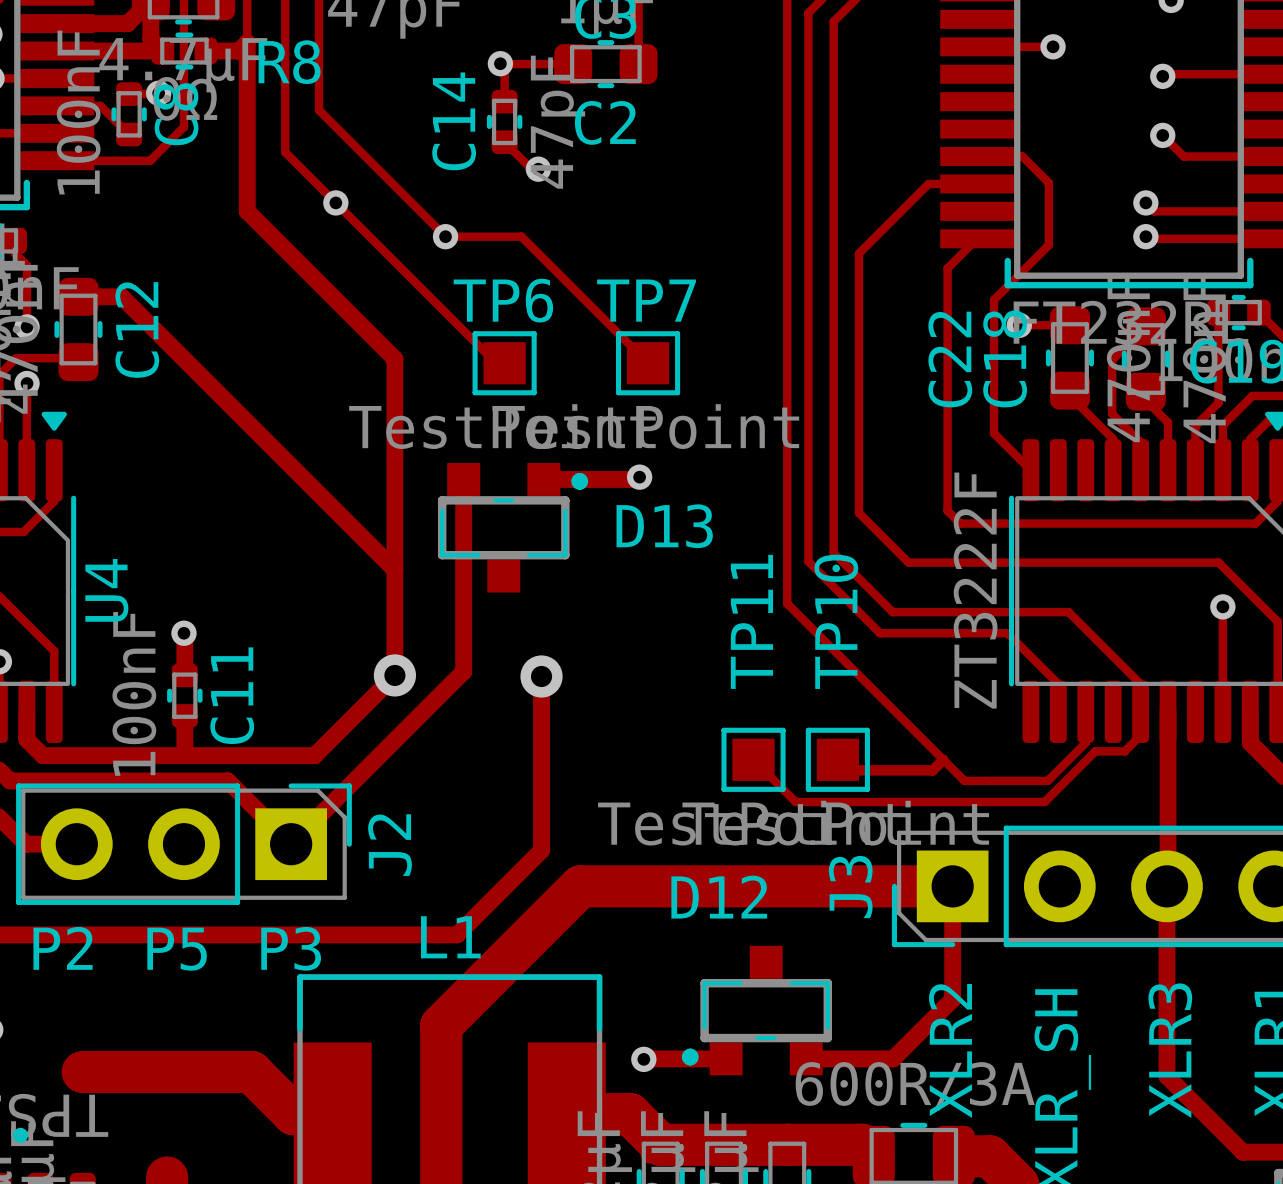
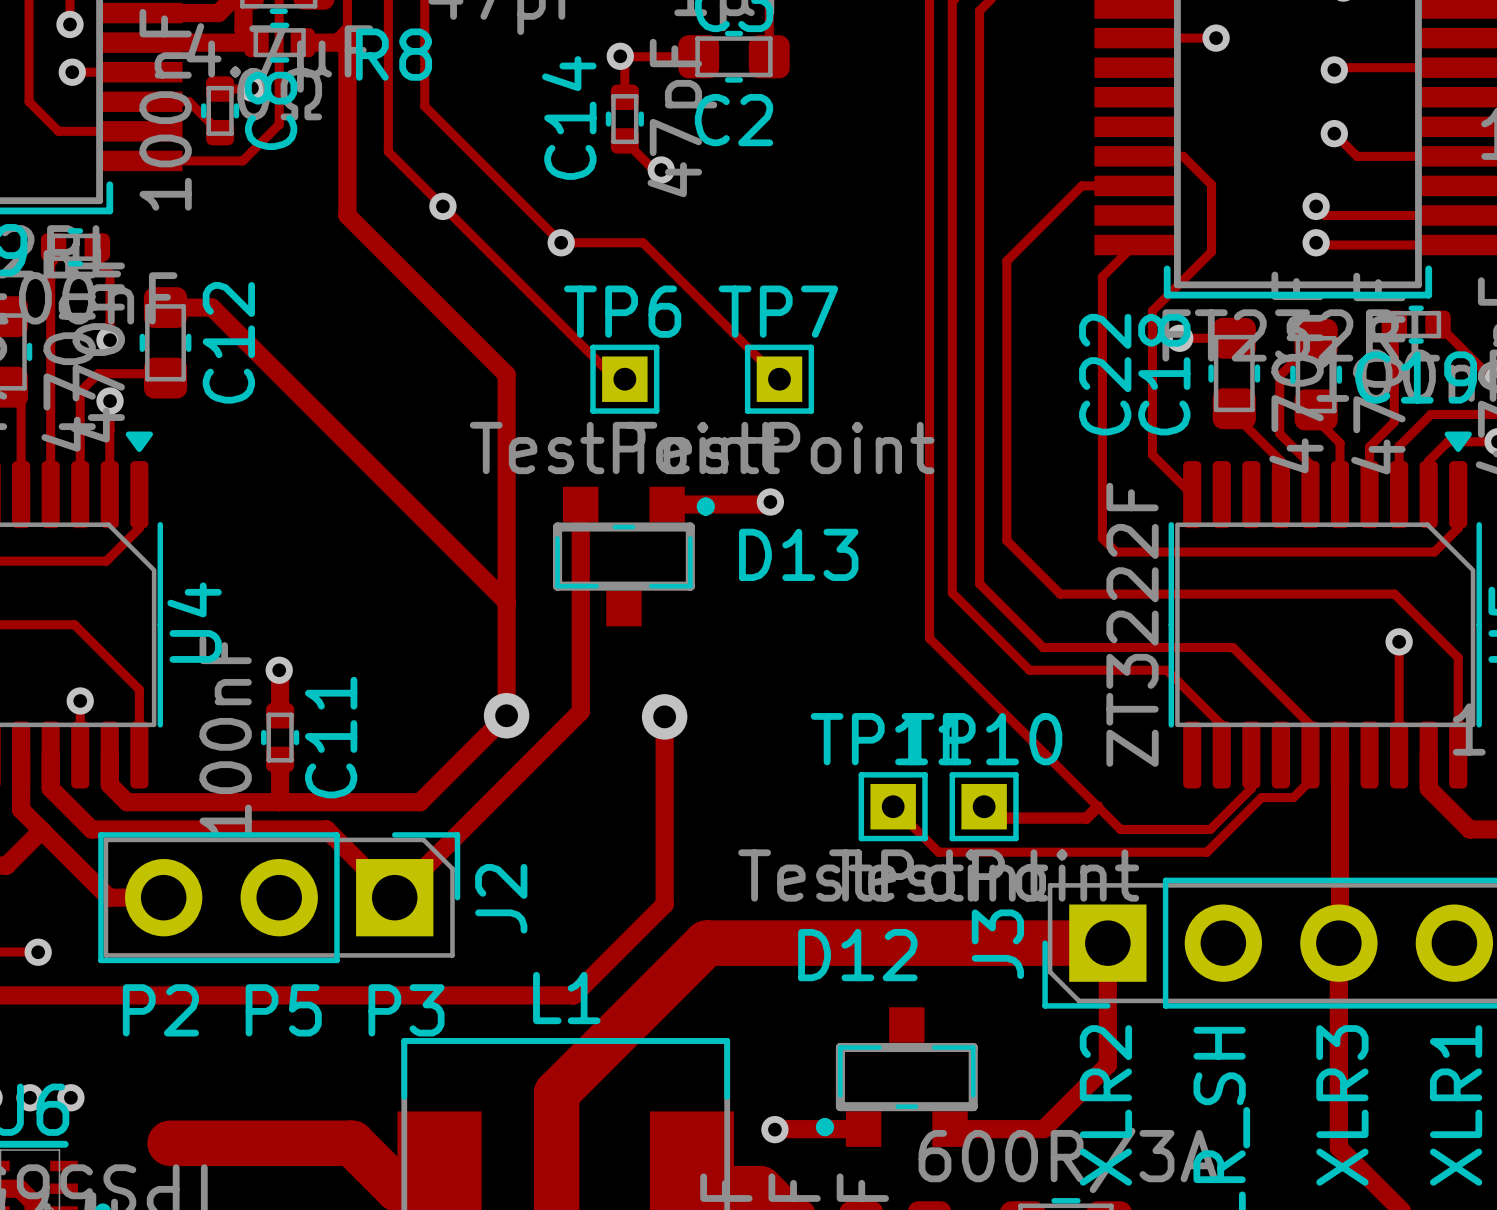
TP6 footprint: [472, 331, 537, 396] -> [590, 344, 660, 414]
TP7 footprint: [615, 331, 681, 396] -> [744, 344, 815, 414]
TP11 footprint: [721, 727, 786, 792] -> [858, 772, 928, 842]
TP10 footprint: [805, 727, 870, 792] -> [949, 772, 1019, 842]

